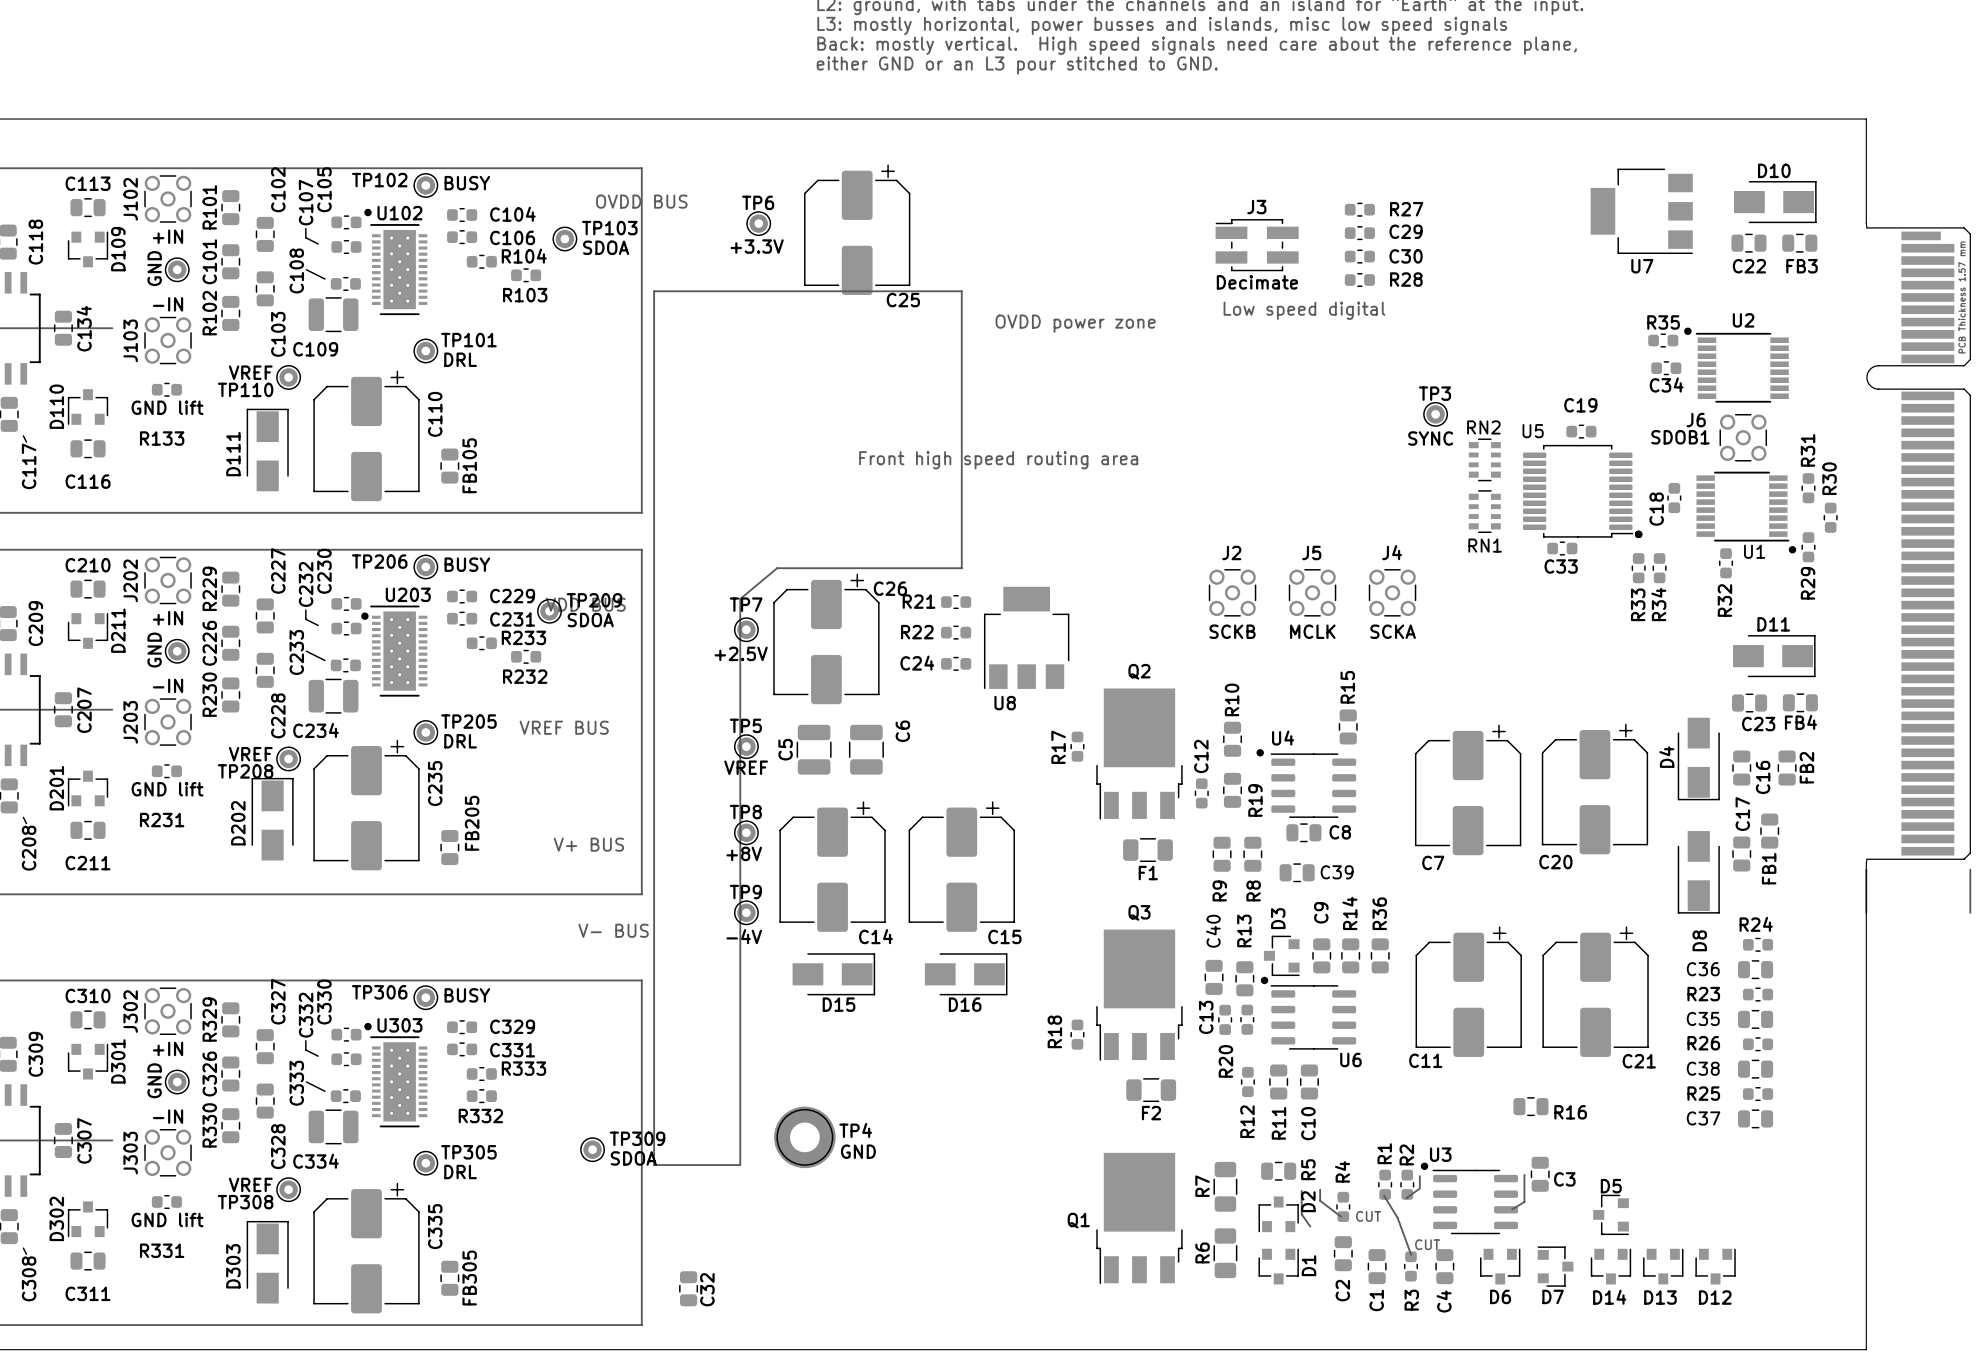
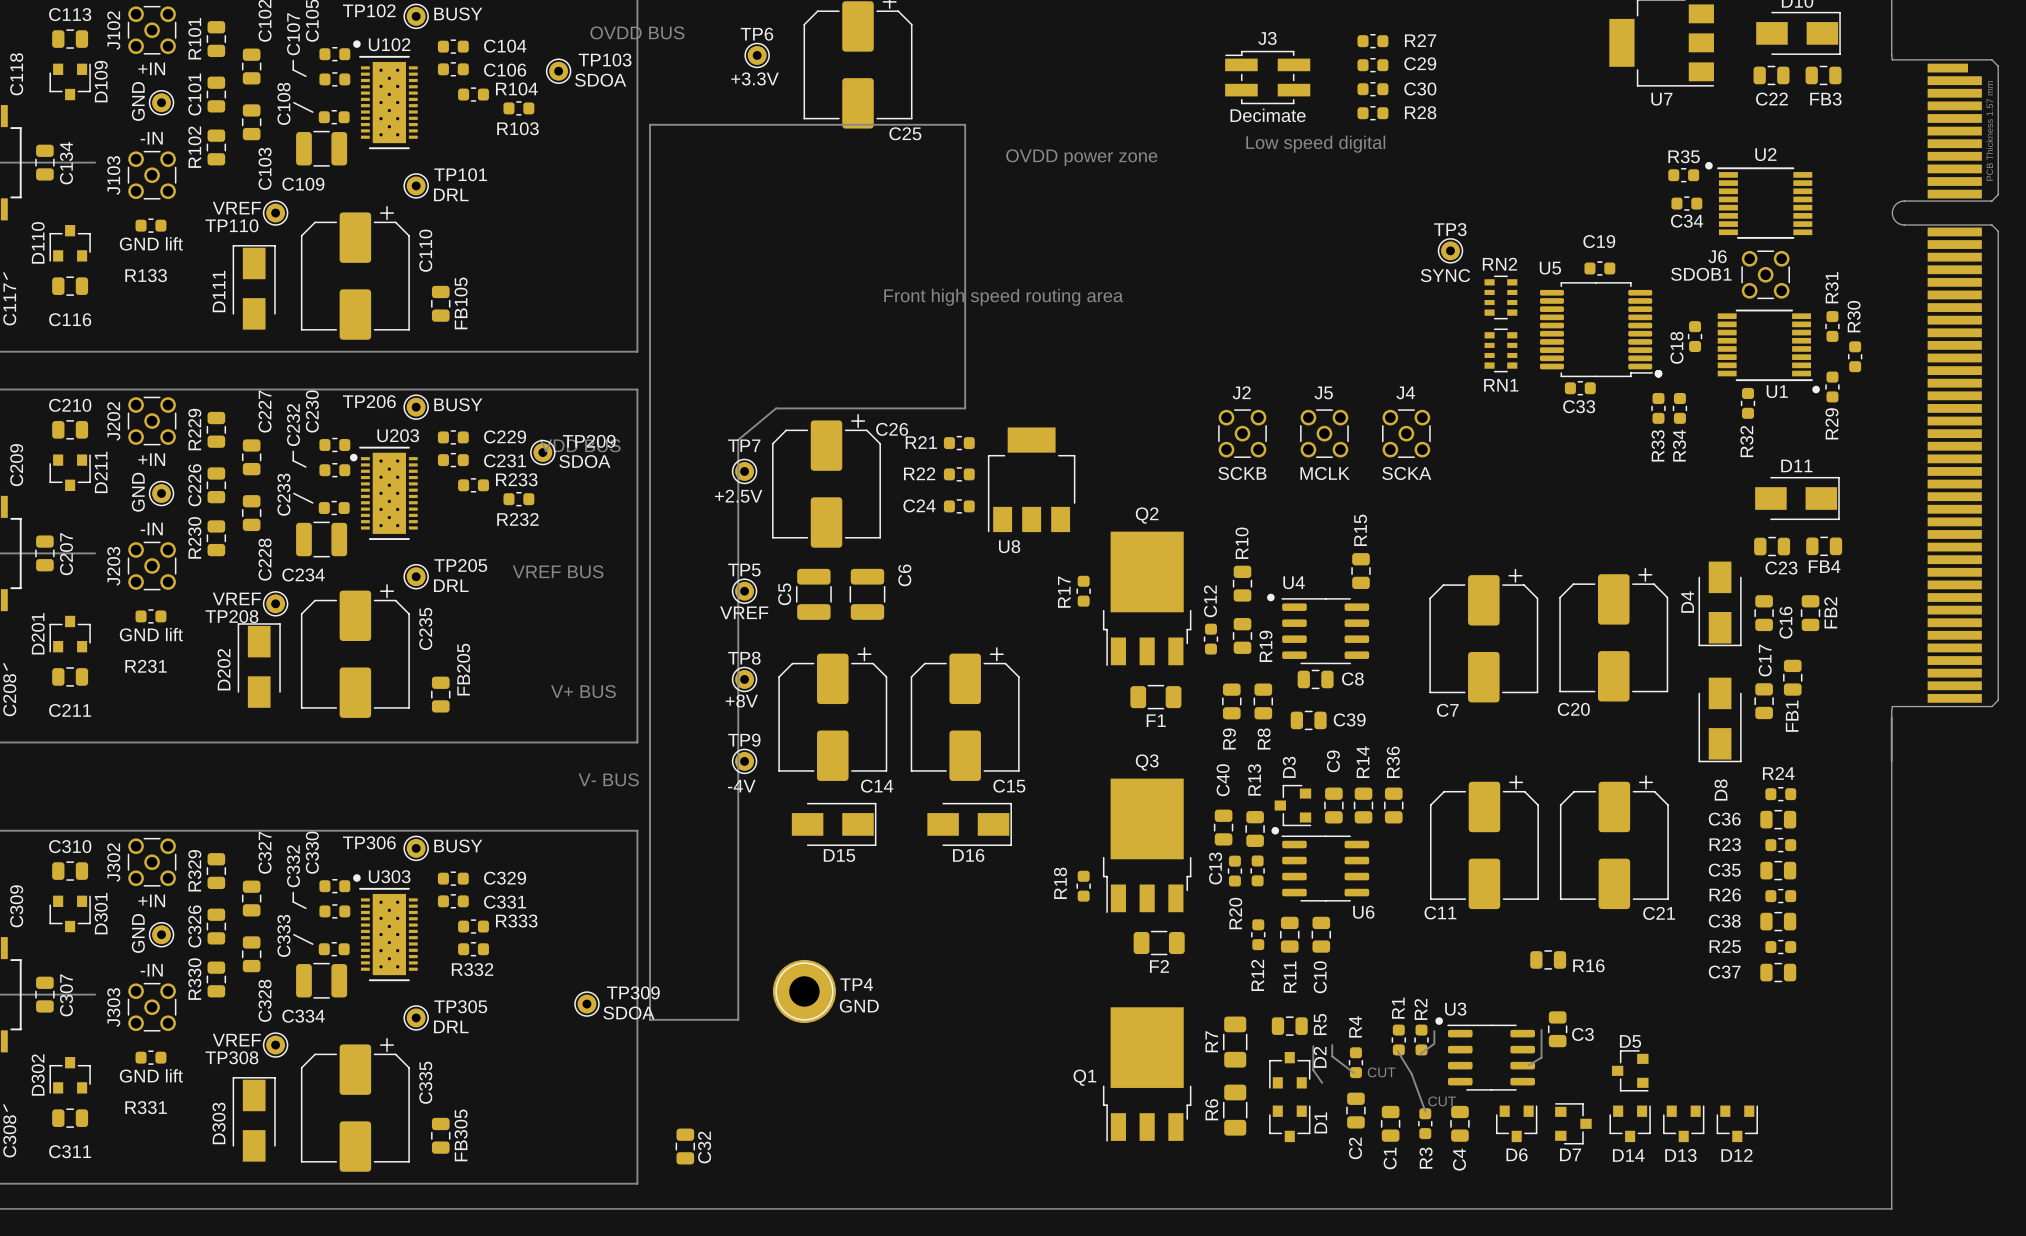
line: (1970, 869) (1970, 912) -> none

